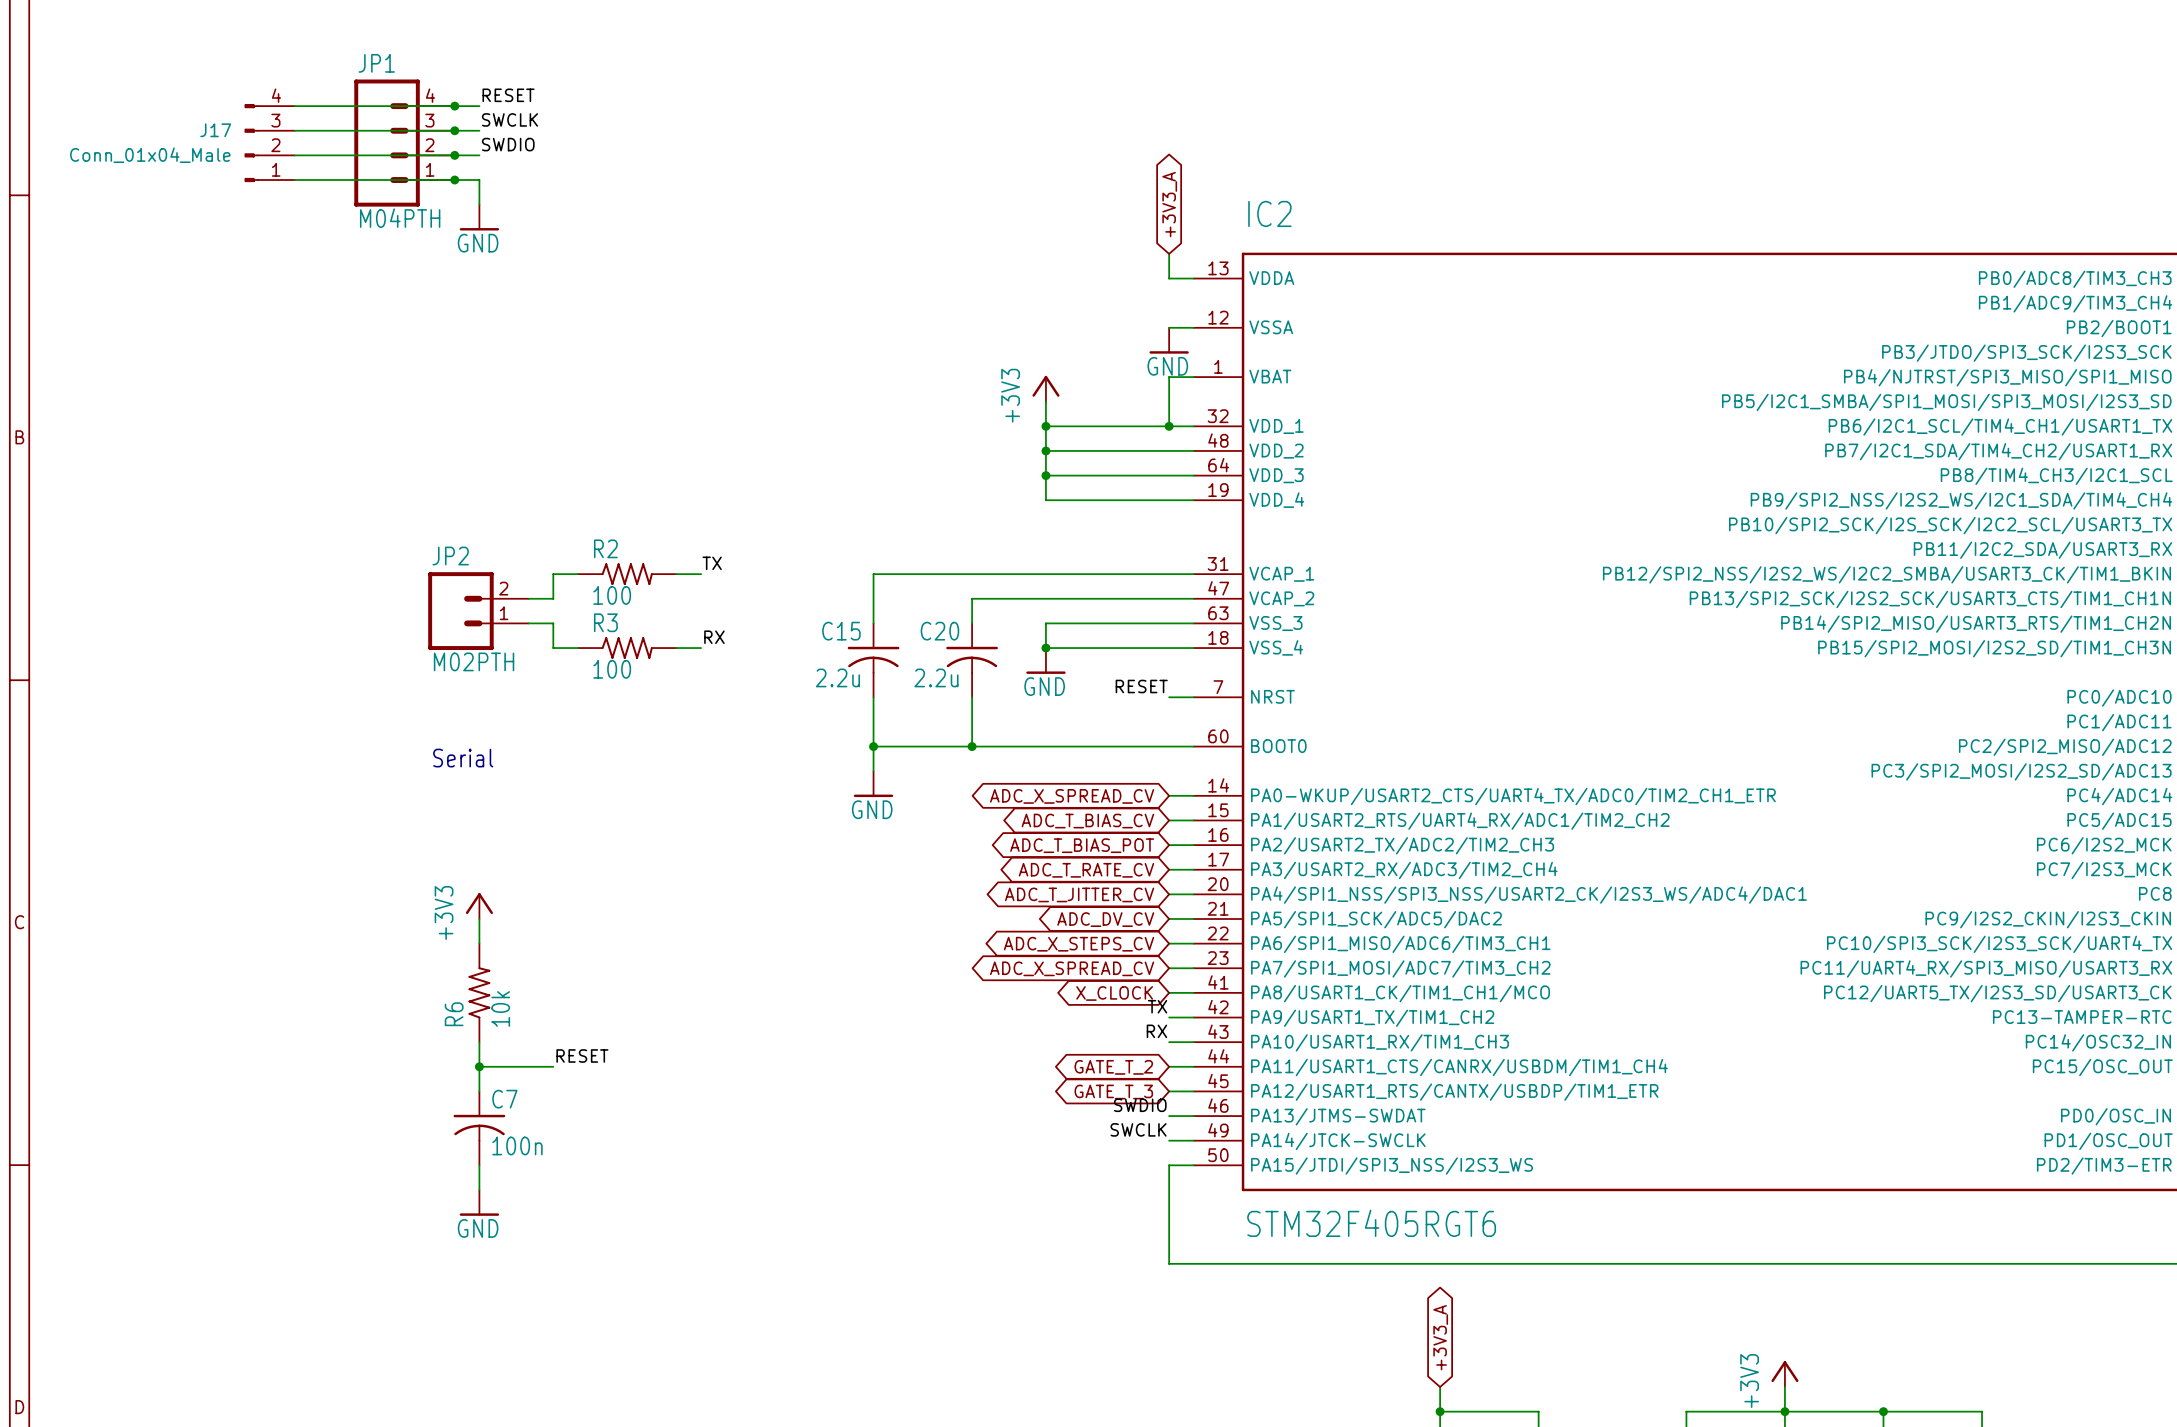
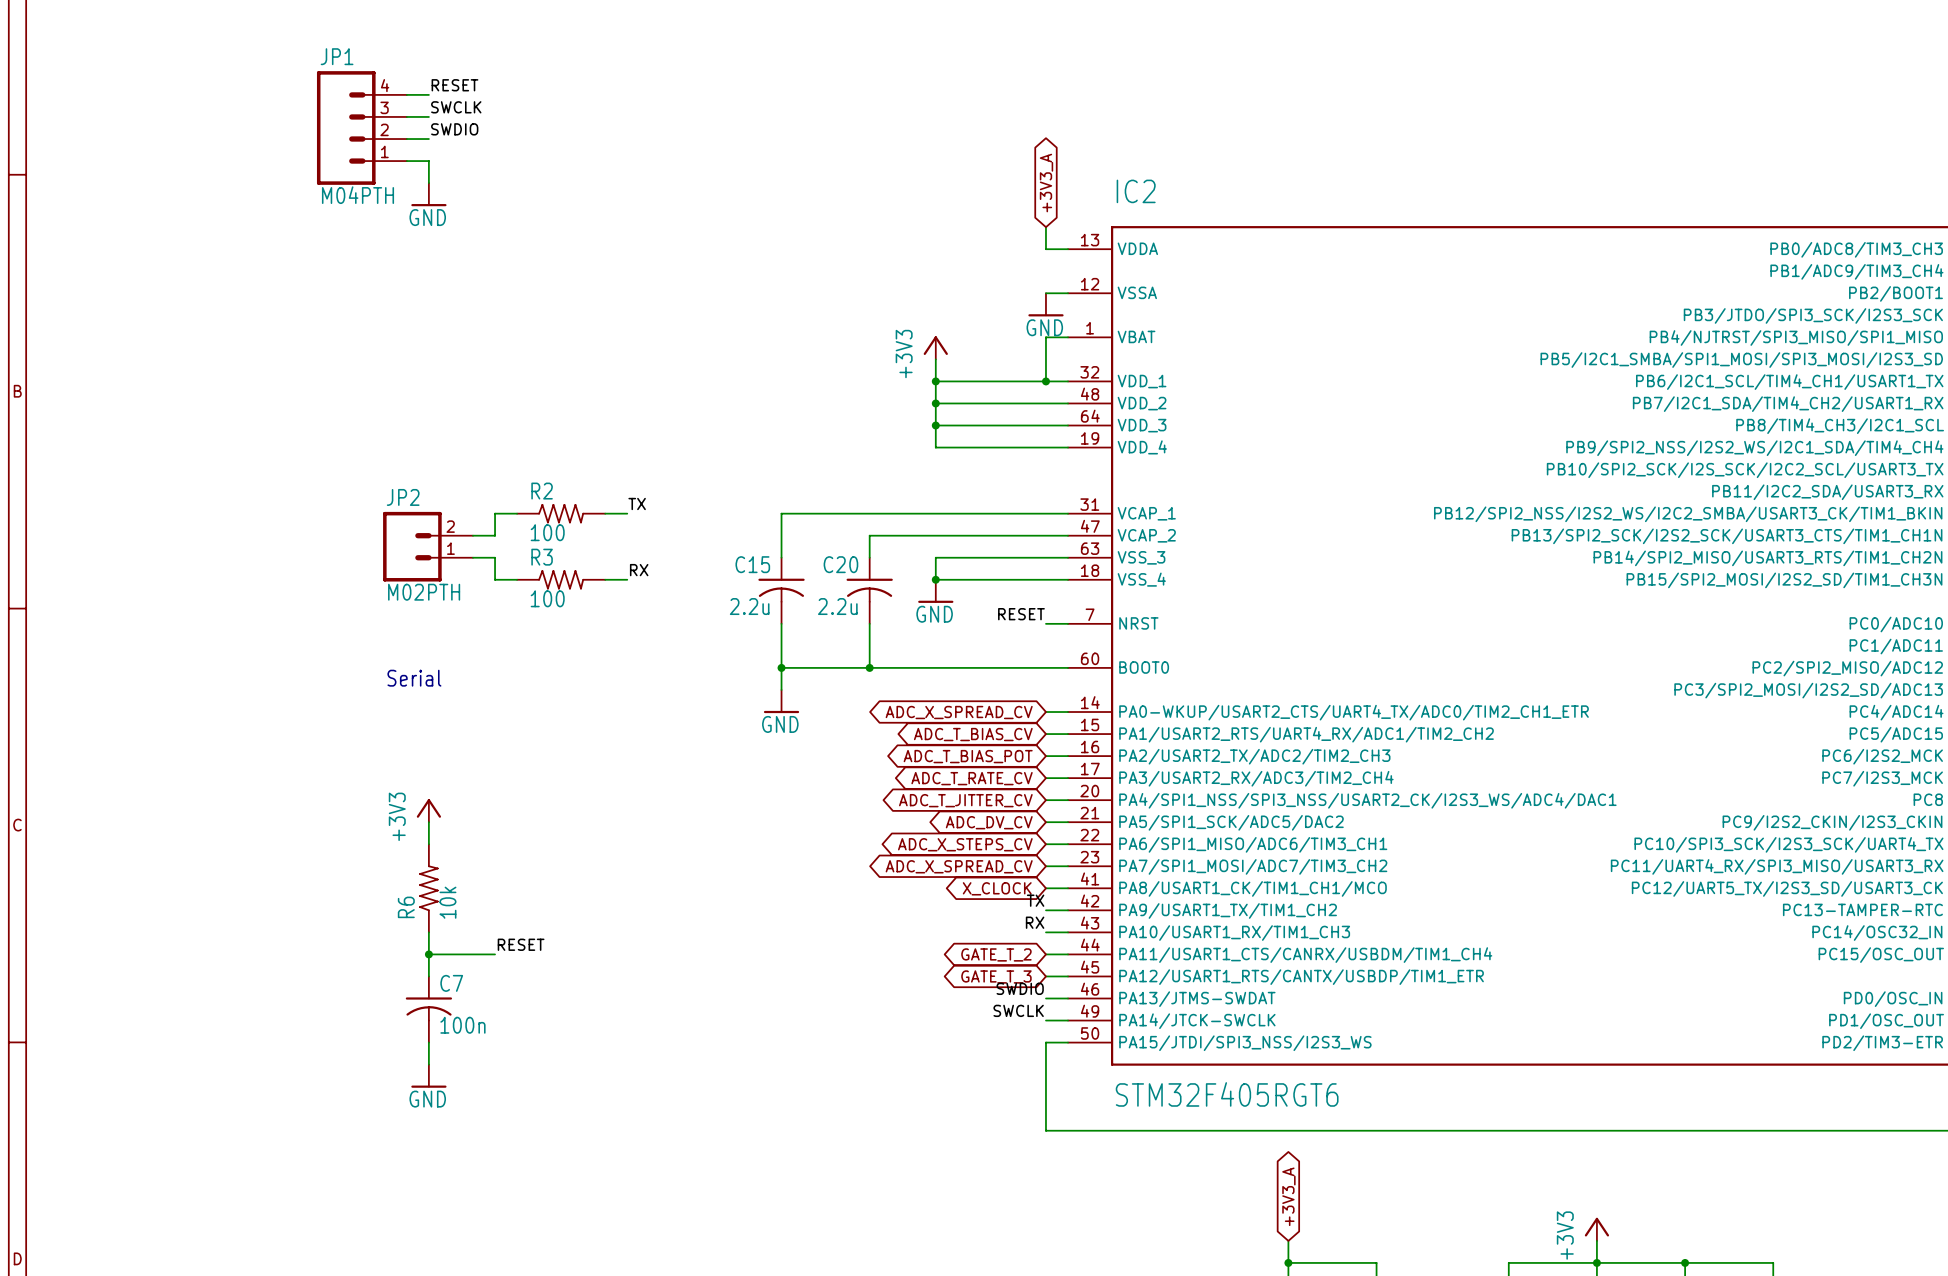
wire: (294, 106) (454, 106) -> none
junction: (454, 106) -> none
wire: (294, 130) (454, 130) -> none
junction: (454, 130) -> none
J17: Conn_01x04_Male (269, 143) -> none
wire: (294, 155) (454, 155) -> none
junction: (454, 155) -> none
wire: (294, 180) (454, 180) -> none
junction: (454, 180) -> none

